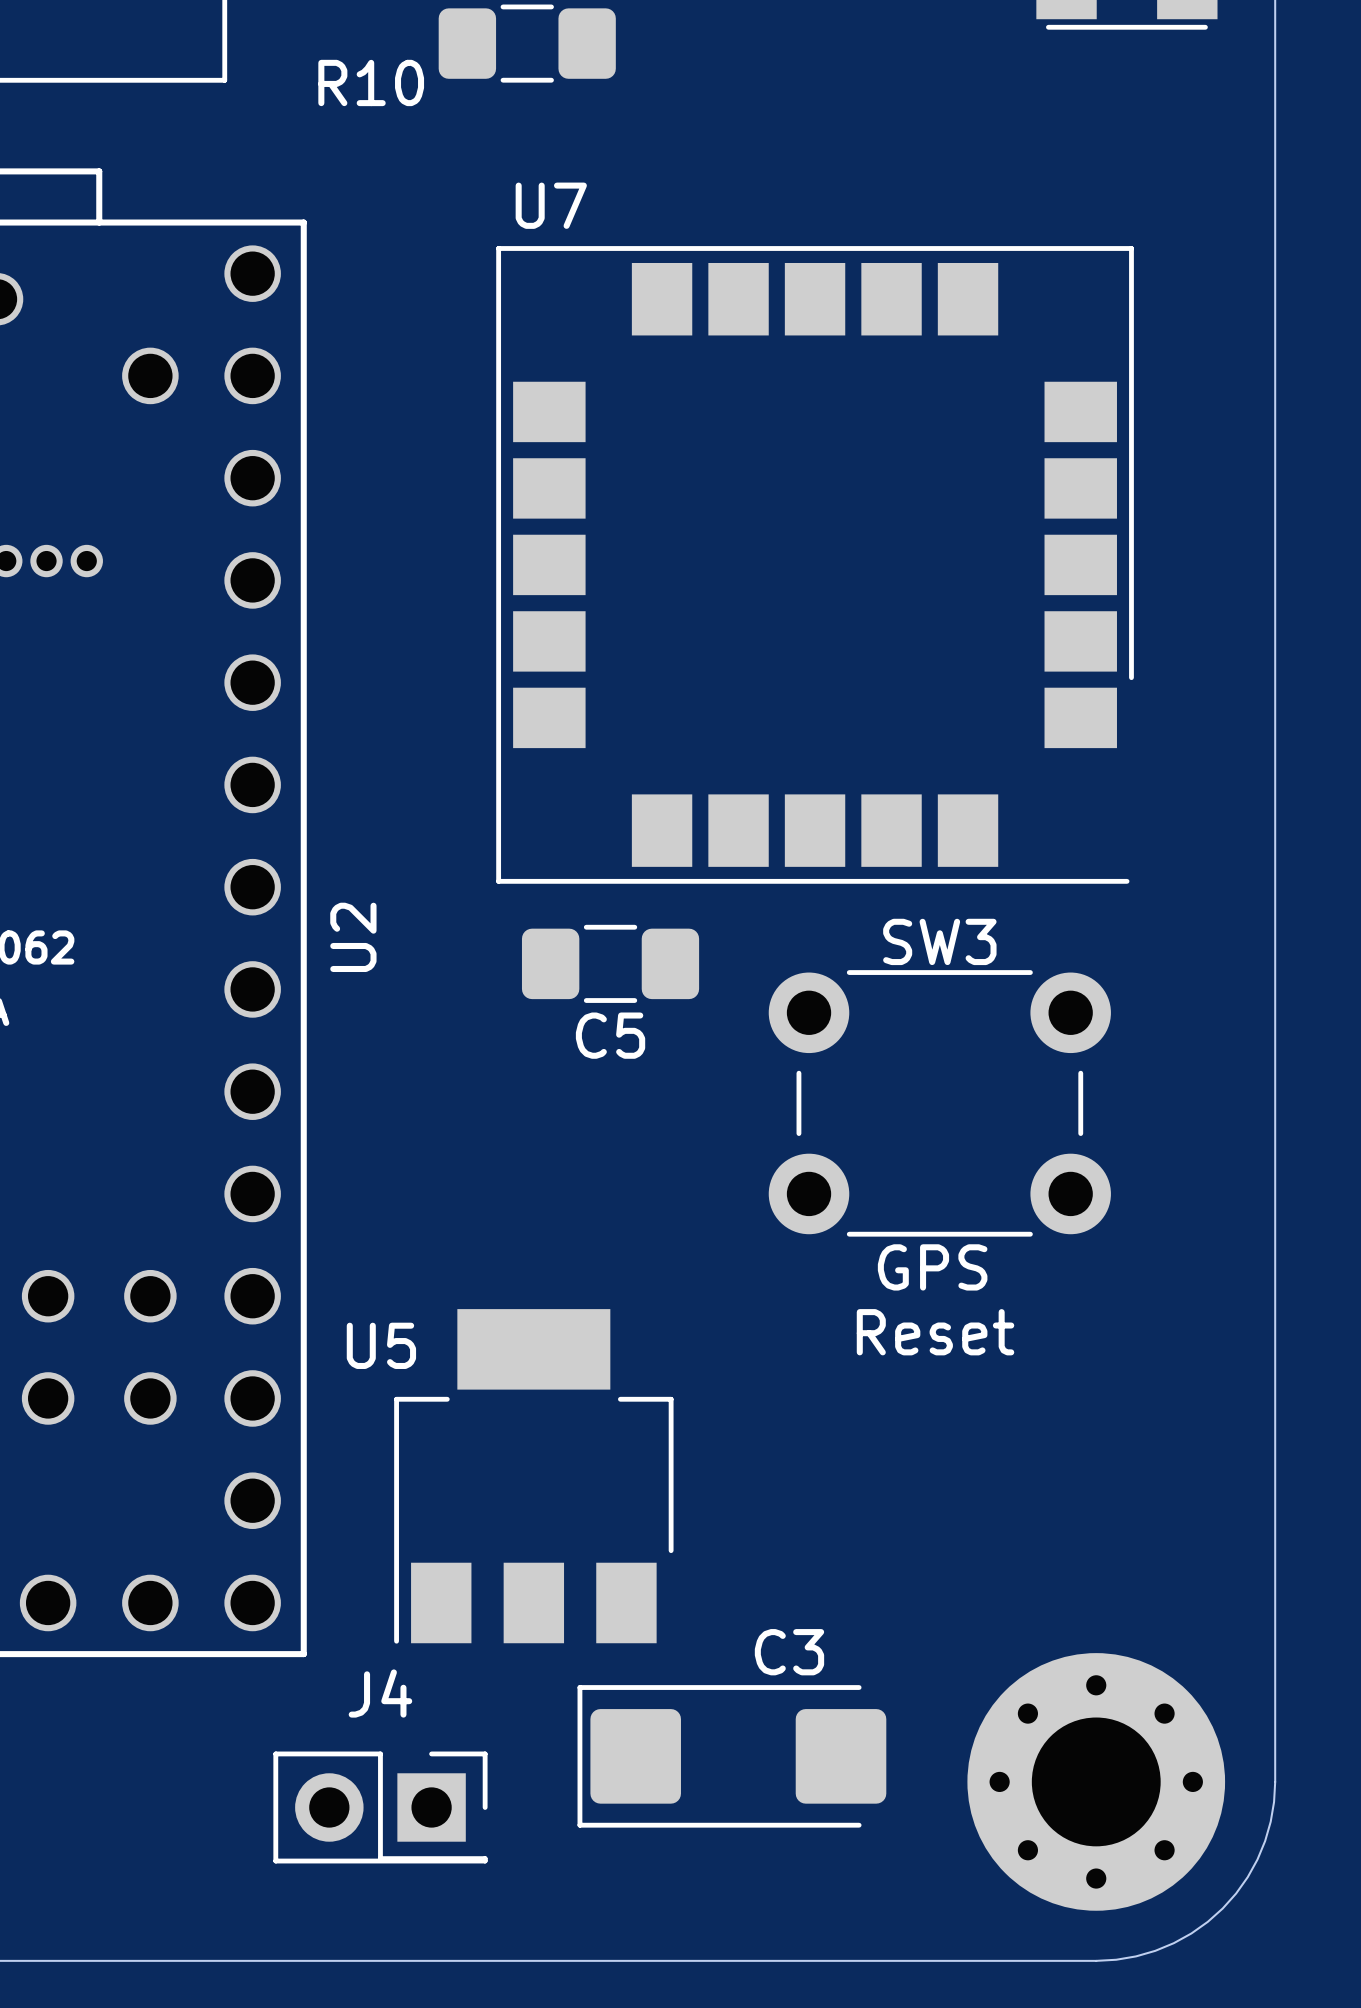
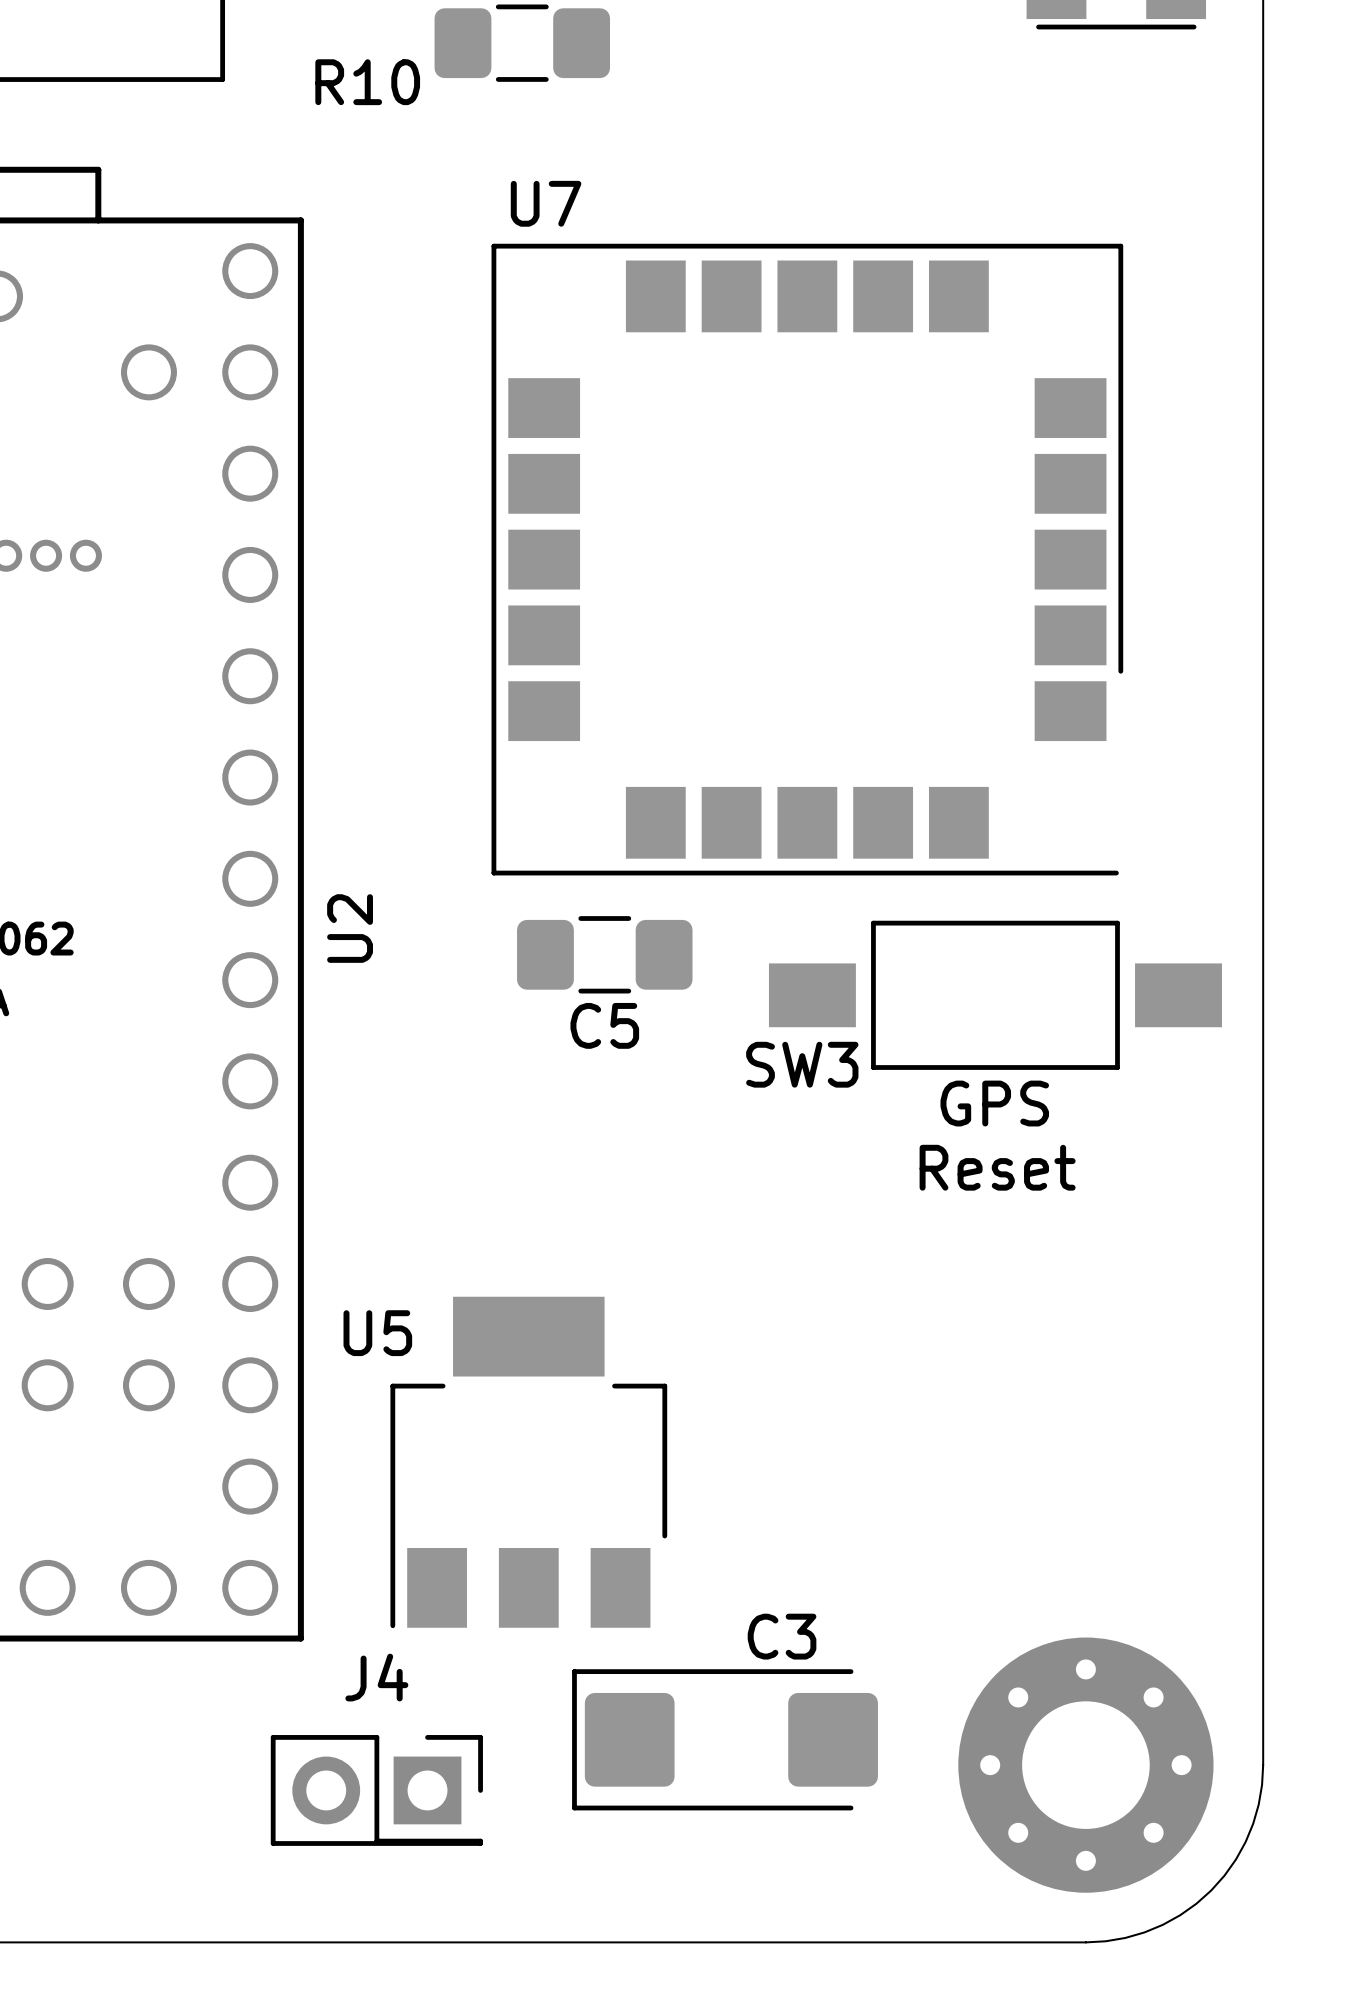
SW3 name position: SW3 (939, 941) -> SW3 (802, 1064)
SW3 footprint: [768, 970, 1111, 1237] -> [768, 920, 1222, 1070]
text position: GPS (932, 1267) -> GPS (994, 1103)
text position: Reset (935, 1332) -> Reset (997, 1167)

